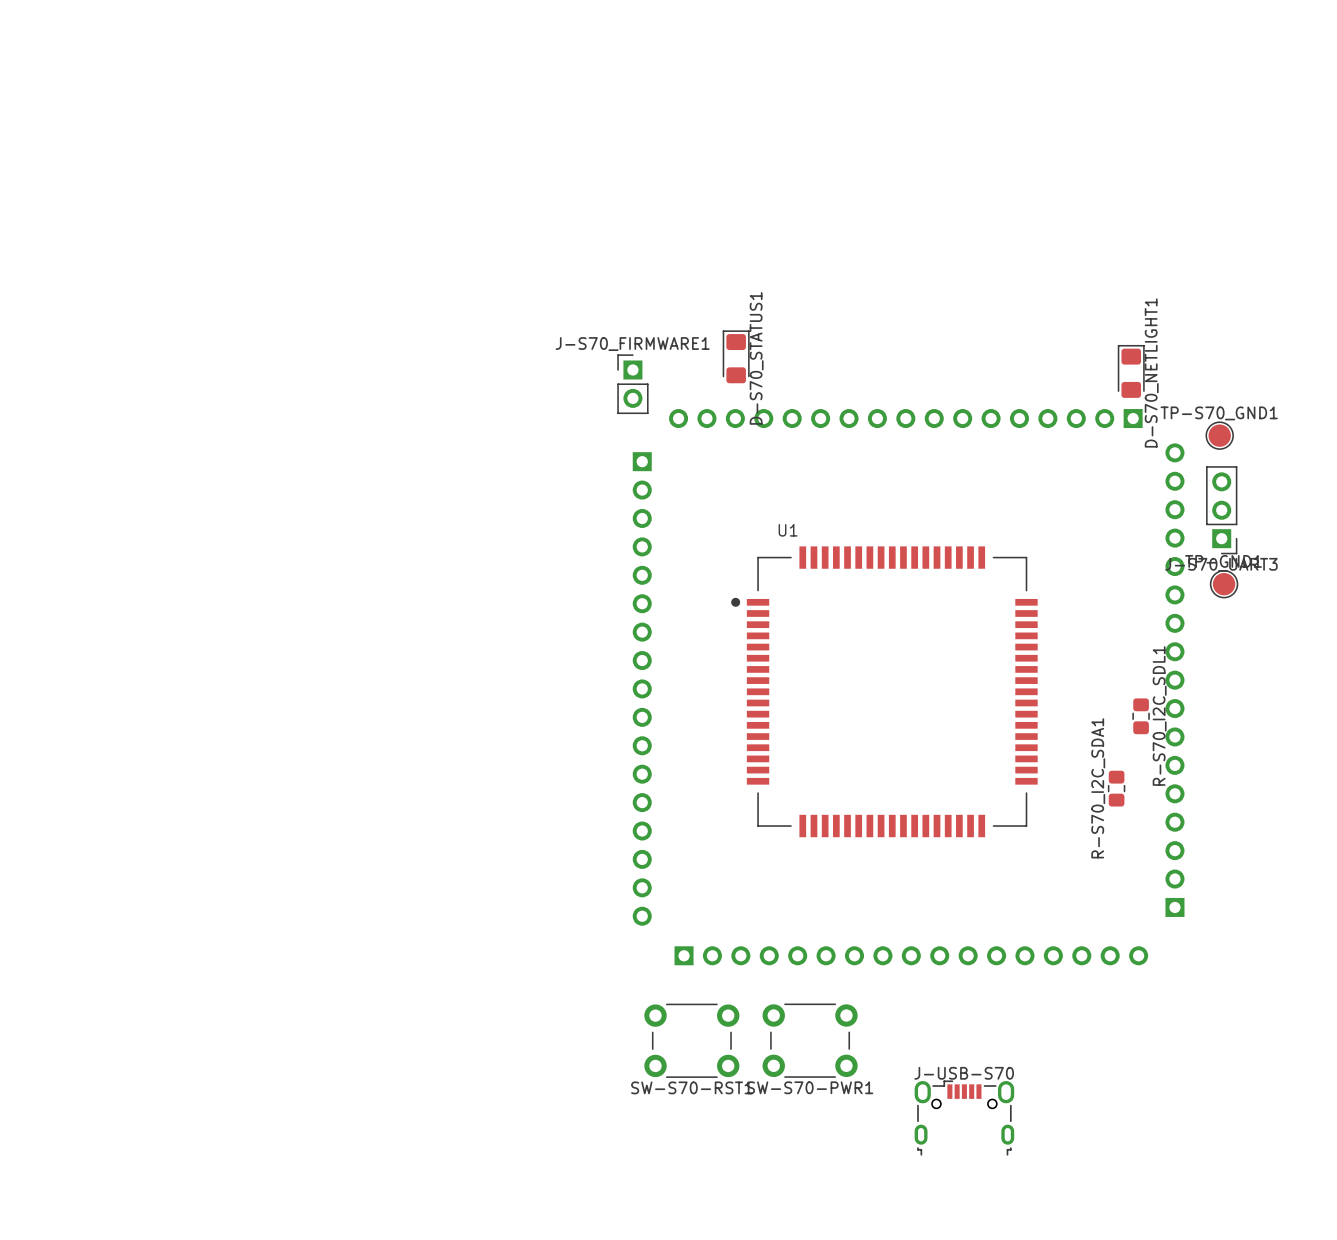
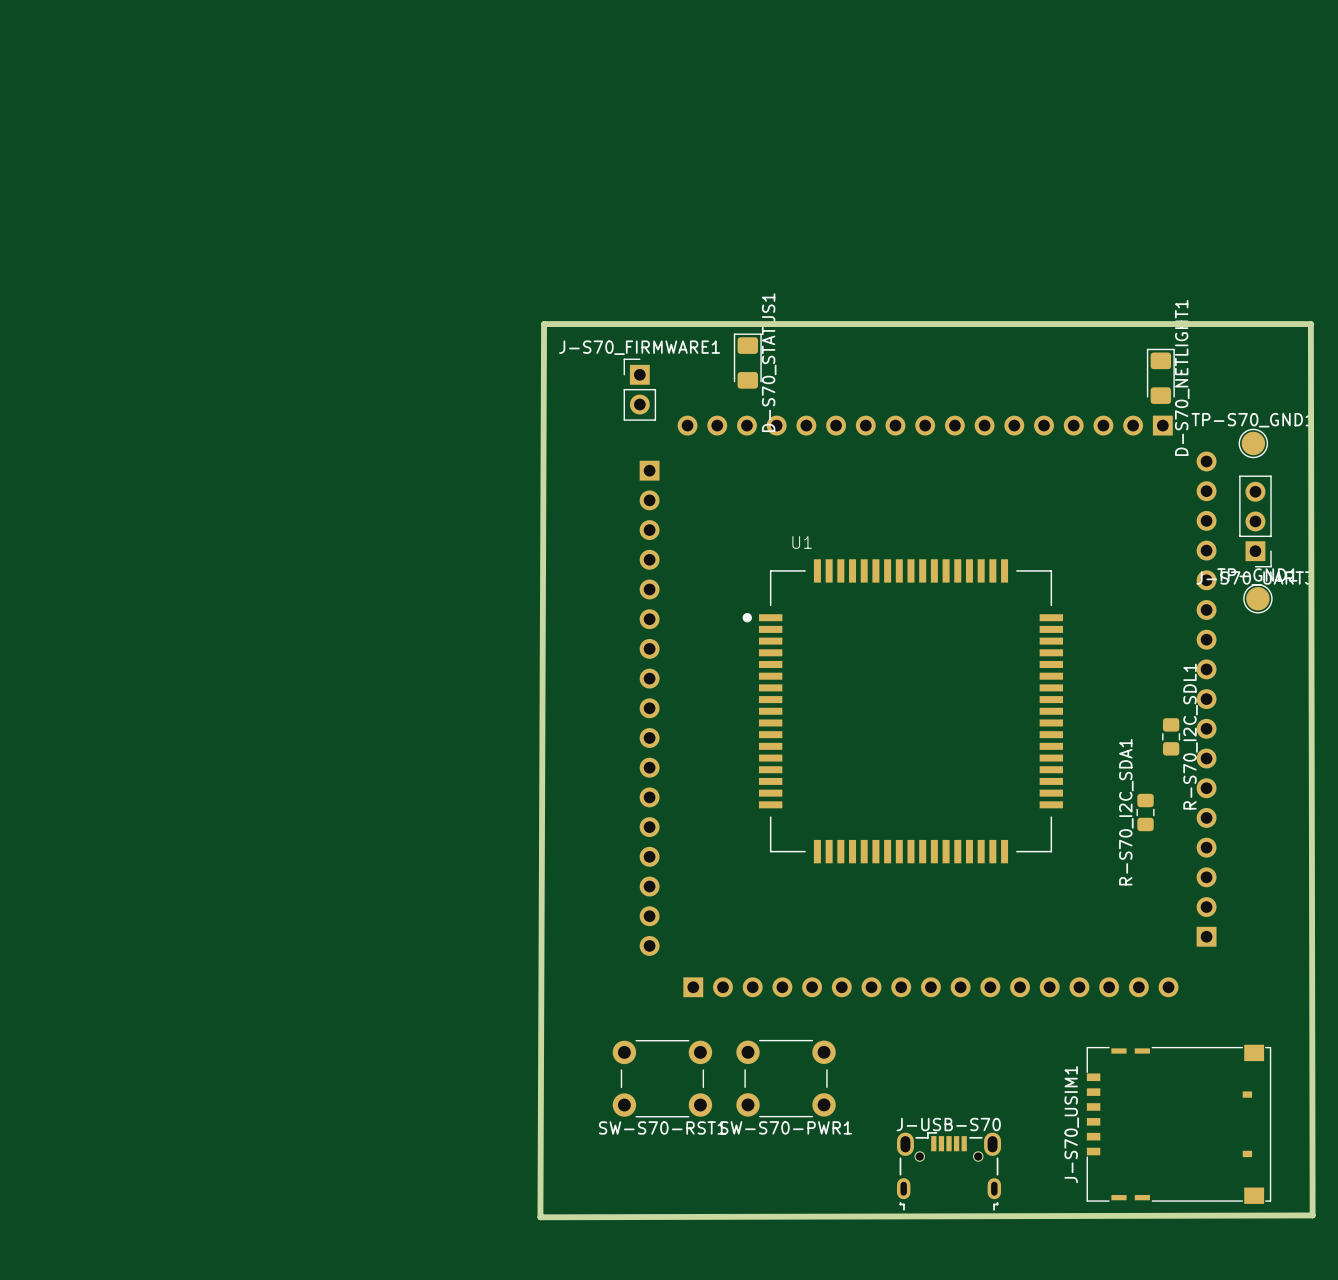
board edge: none -> (544, 324) (1310, 324) (1312, 1215) (540, 1217) (544, 324)
SW-S70-RST1 position: (691, 1040) -> (662, 1078)
SW-S70-PWR1 position: (810, 1040) -> (786, 1078)
J-S70_USIM1: none -> (1178, 1124)
J-USB-S70 position: (964, 1118) -> (949, 1171)

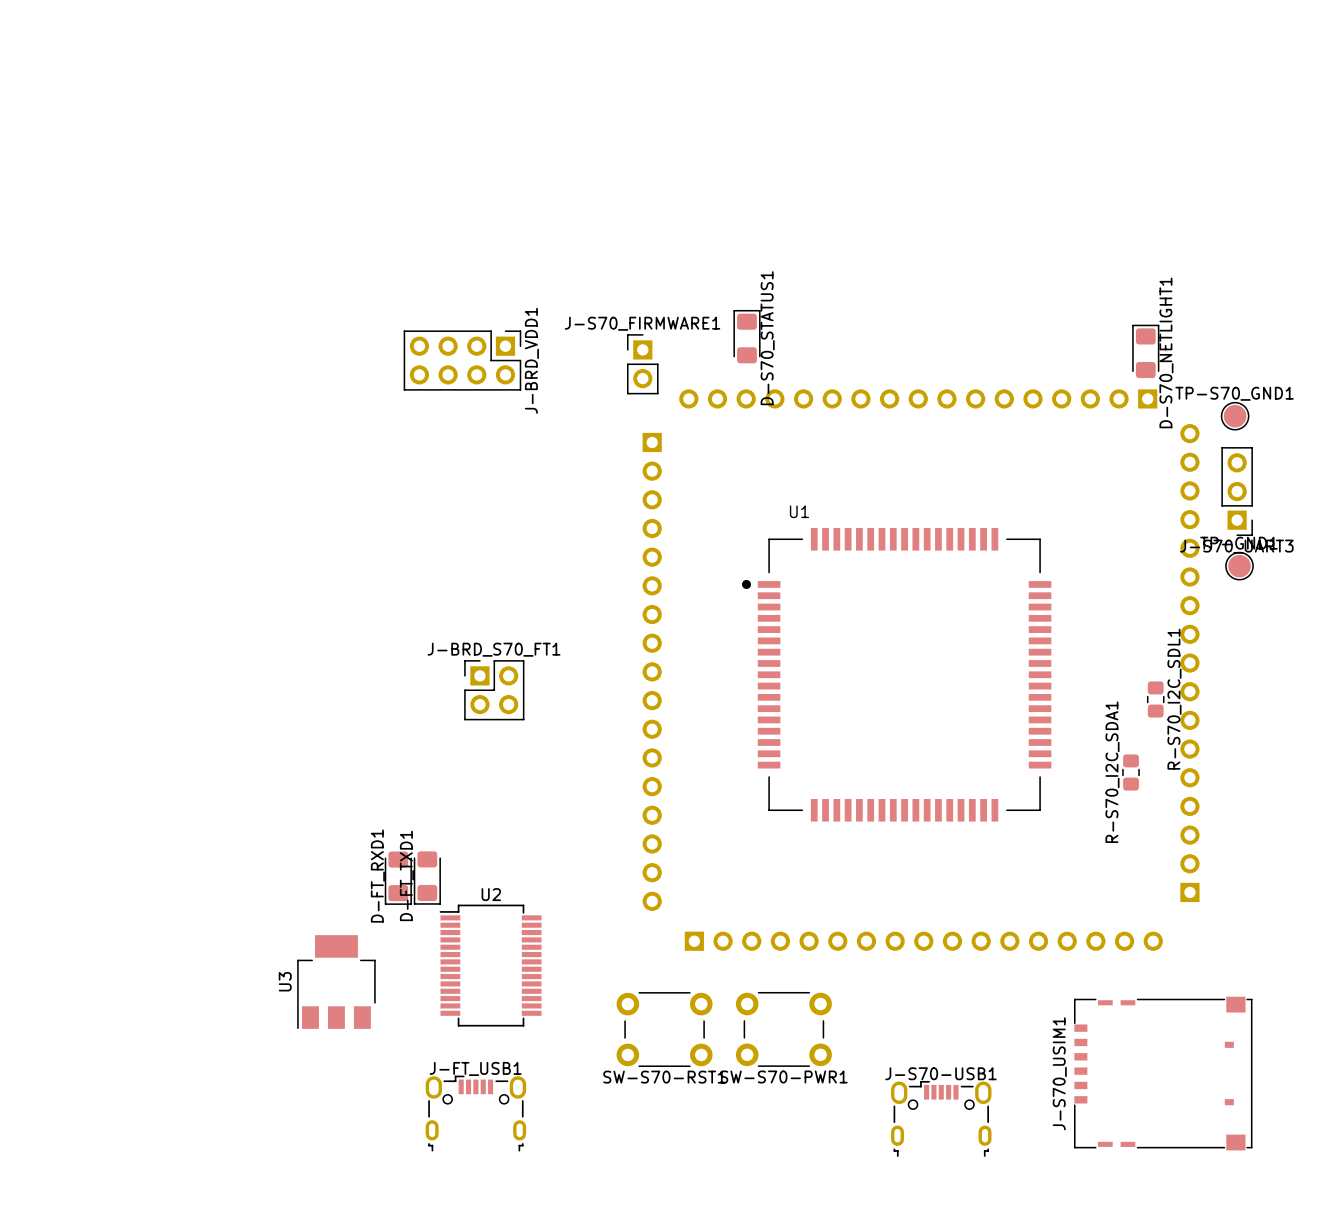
board edge: (544, 324) (1310, 324) (1312, 1215) (540, 1217) (544, 324) -> none
J-BRD_VDD1: none -> (462, 360)
J-BRD_S70_FT1: none -> (494, 690)
D-FT_RXD1: none -> (398, 878)
D-FT_TXD1: none -> (427, 878)
U2: none -> (490, 965)
U3: none -> (336, 982)
J-USB-S70 name: J-USB-S70 (948, 1124) -> J-S70-USB1 (941, 1073)
J-FT_USB1: none -> (475, 1113)

